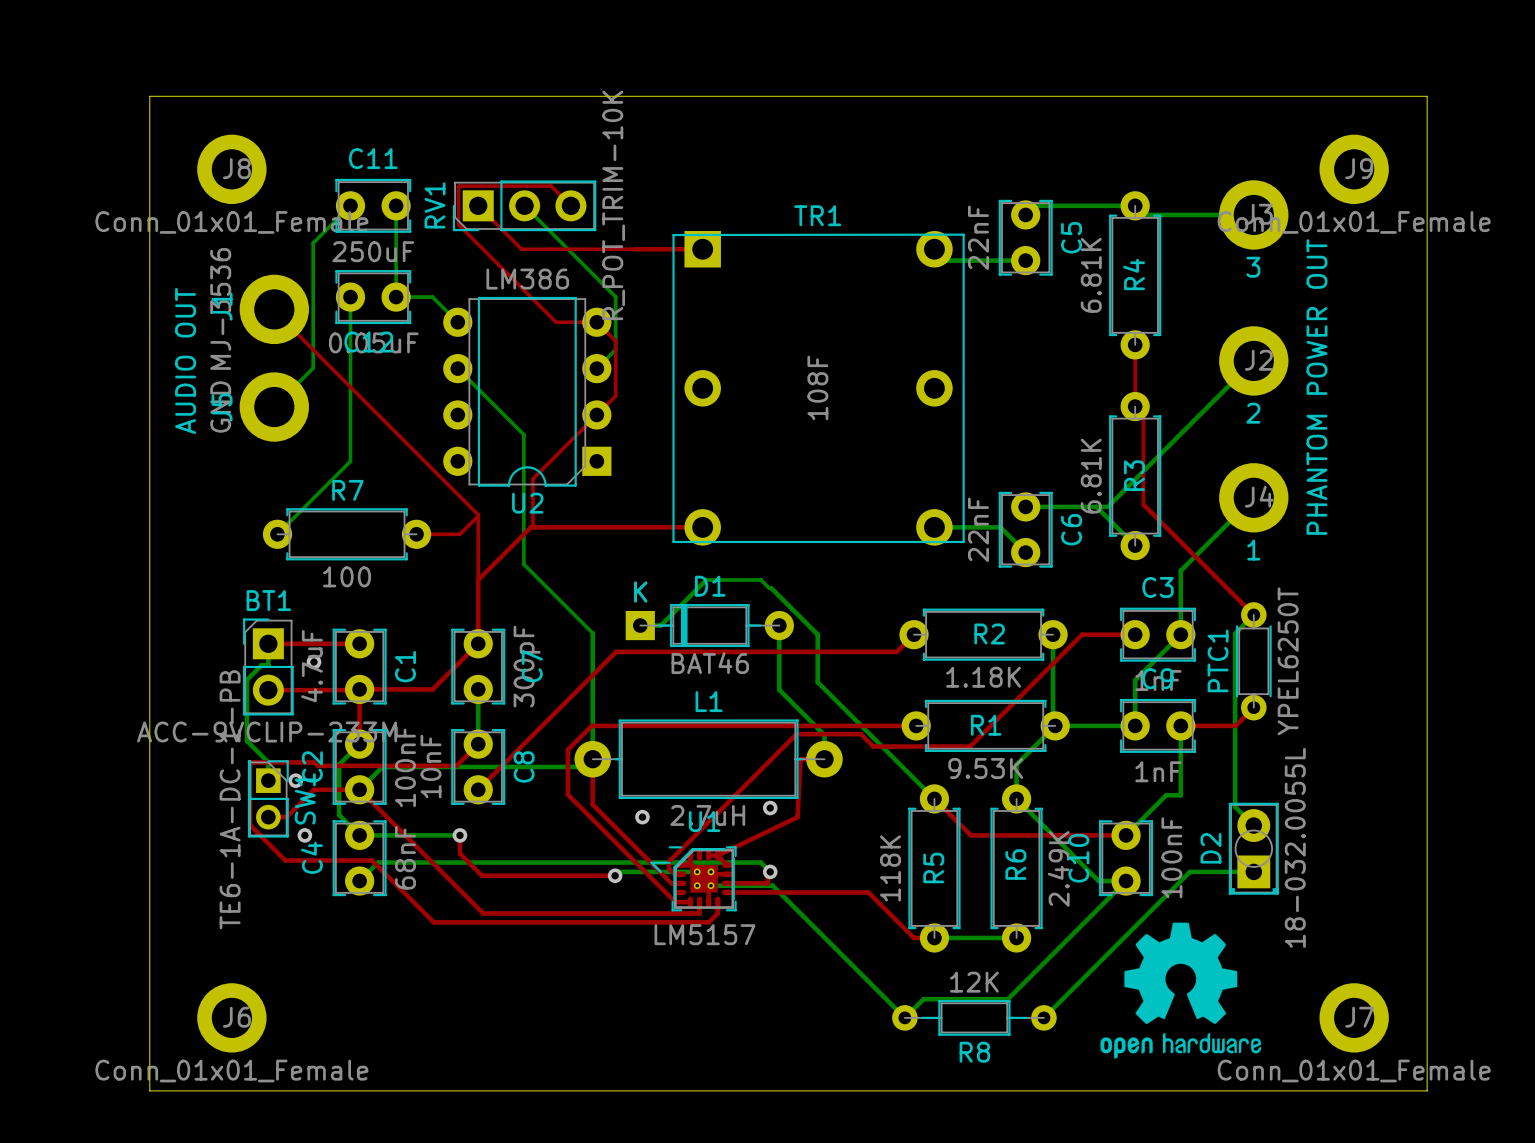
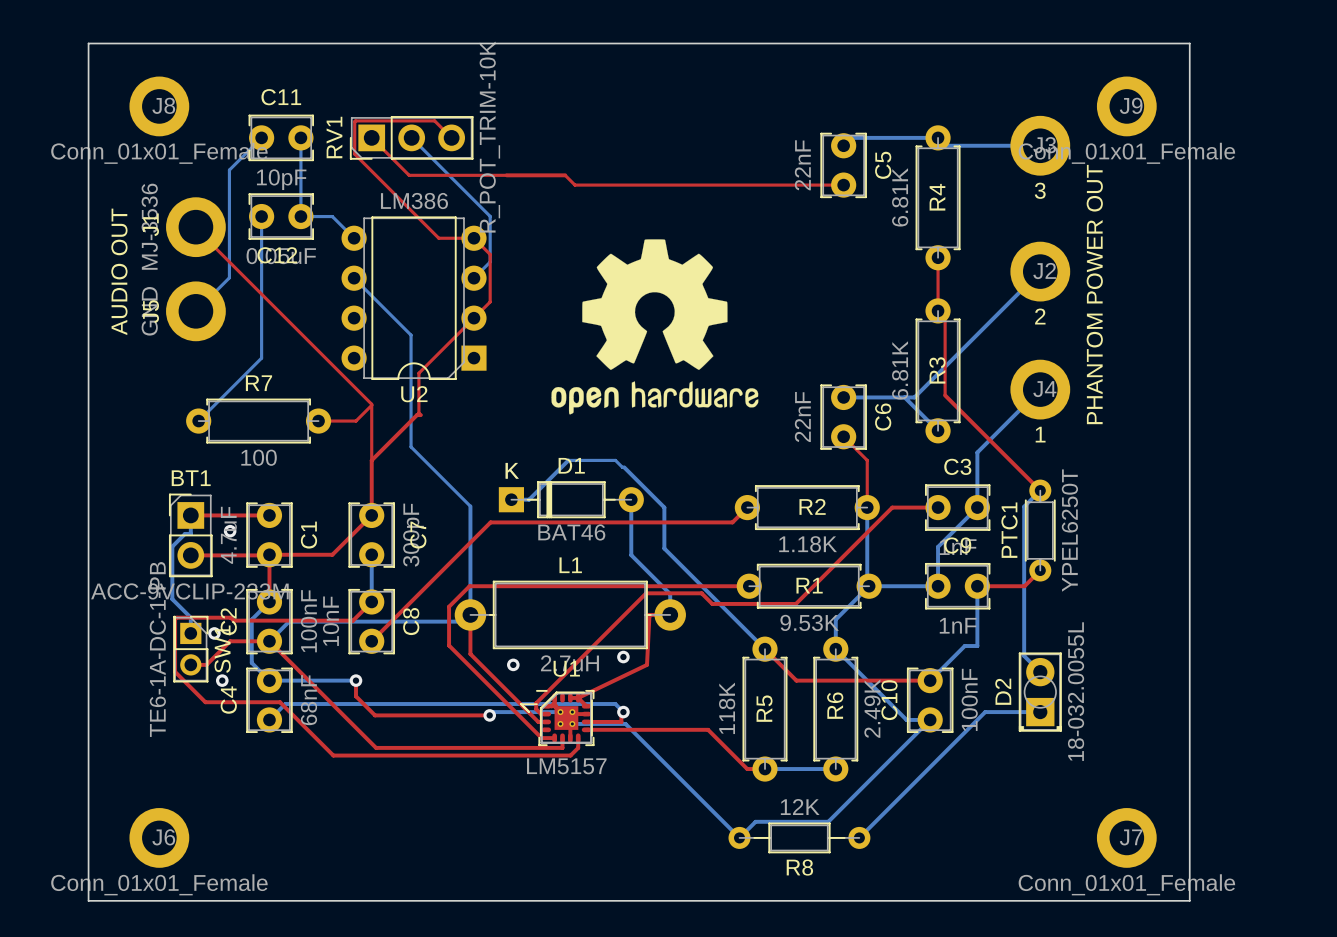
top track: none -> (565, 175) (574, 185) (843, 185)
bottom track: (934, 249) (945, 260) (1025, 260) -> none
C11 value: 250uF (373, 251) -> 10pF (281, 179)
drawing: none -> [551, 239, 759, 415]
TR1: 108F (818, 388) -> none
top track: (535, 527) (702, 527) -> none
bottom track: (934, 527) (1000, 527) (1025, 552) -> none
top track: none -> (843, 436) (867, 460) (867, 507)
drawing: [1100, 922, 1262, 1059] -> none

